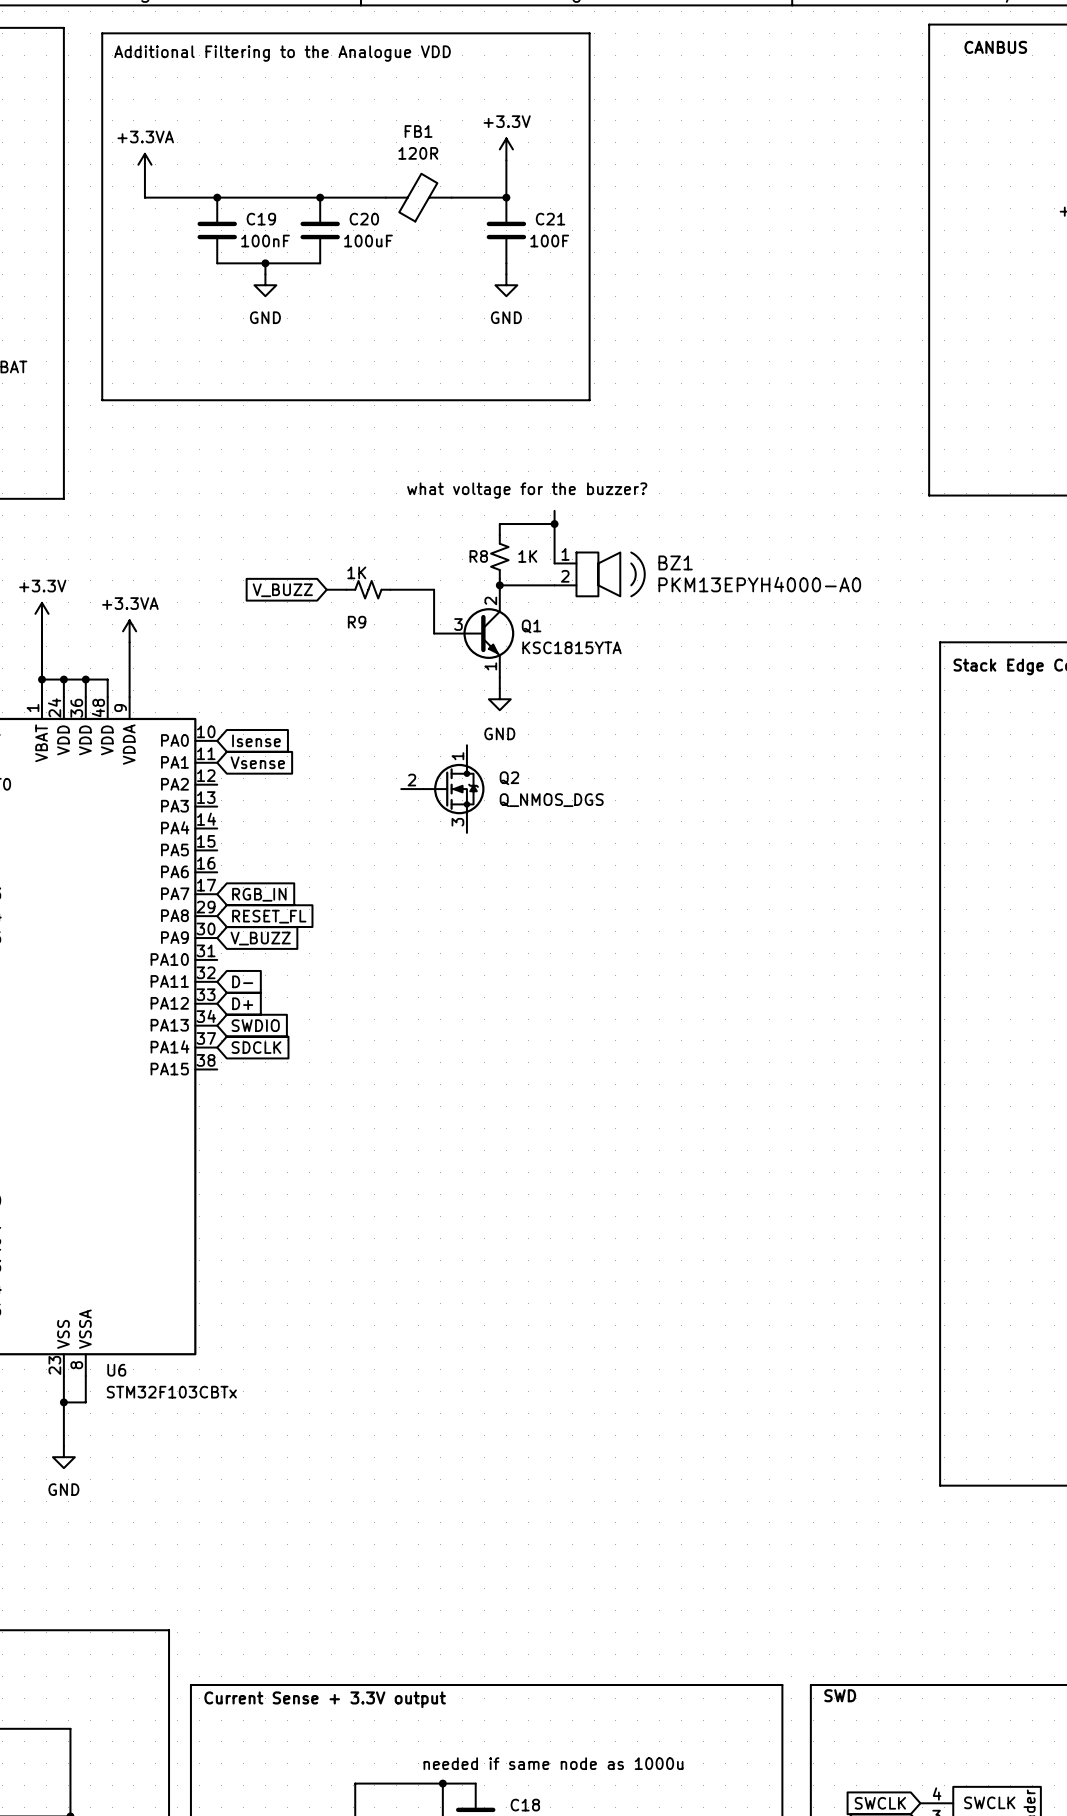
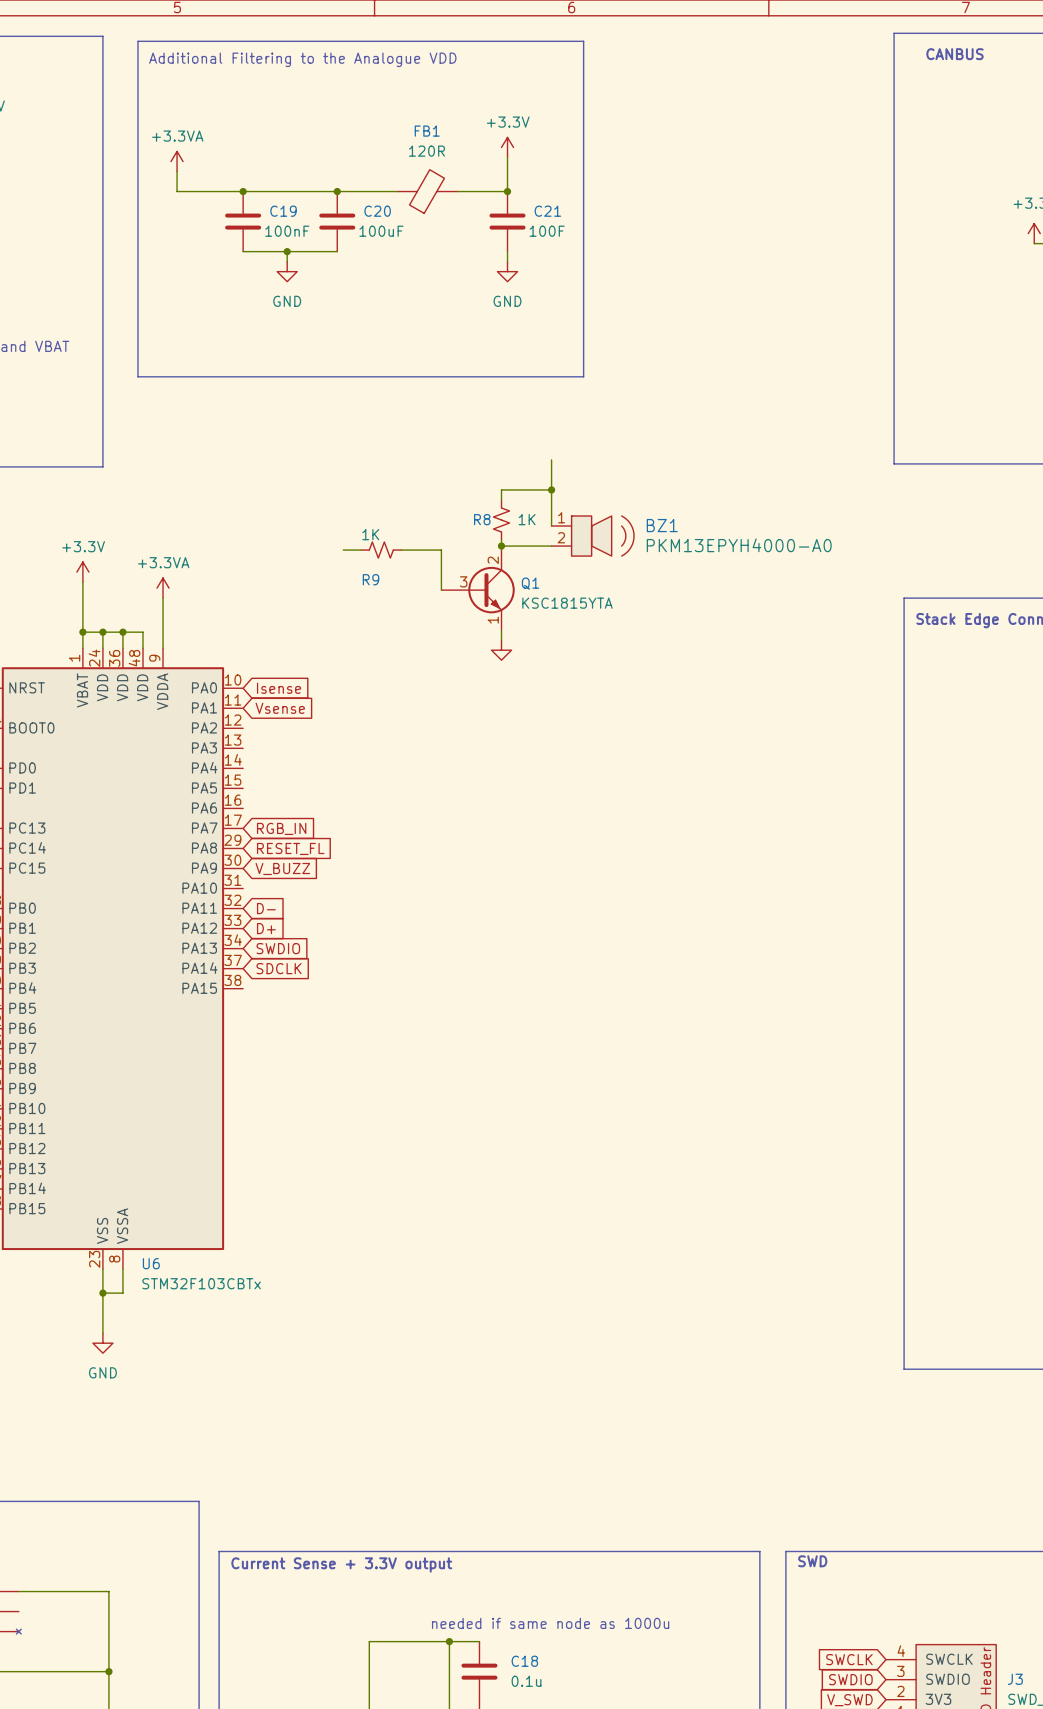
text: what voltage for the buzzer? (527, 490) -> none
wire: none -> (551, 459) (551, 477)
global label: V_BUZZ (282, 590) -> none
power symbol text: GND (499, 733) -> none
Q2: Q_NMOS_DGS (442, 789) -> none

